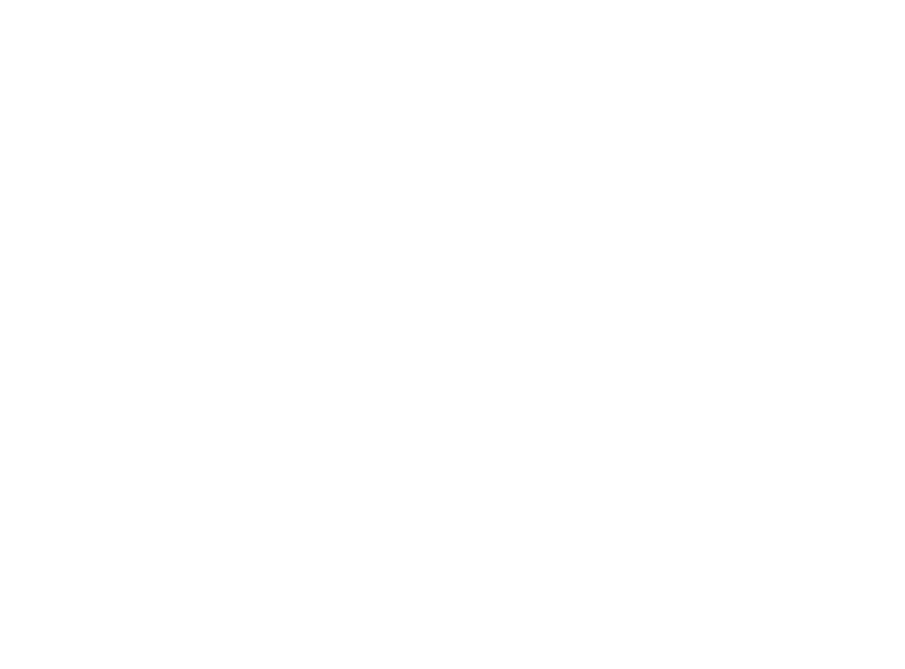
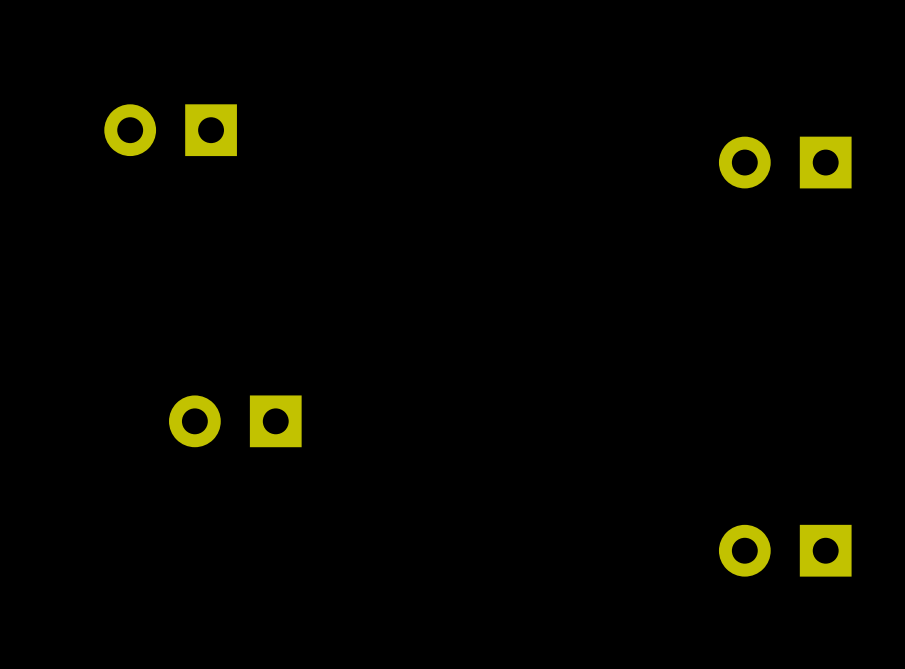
part: none -> (170, 130)
part: none -> (785, 162)
part: none -> (235, 421)
part: none -> (785, 550)

